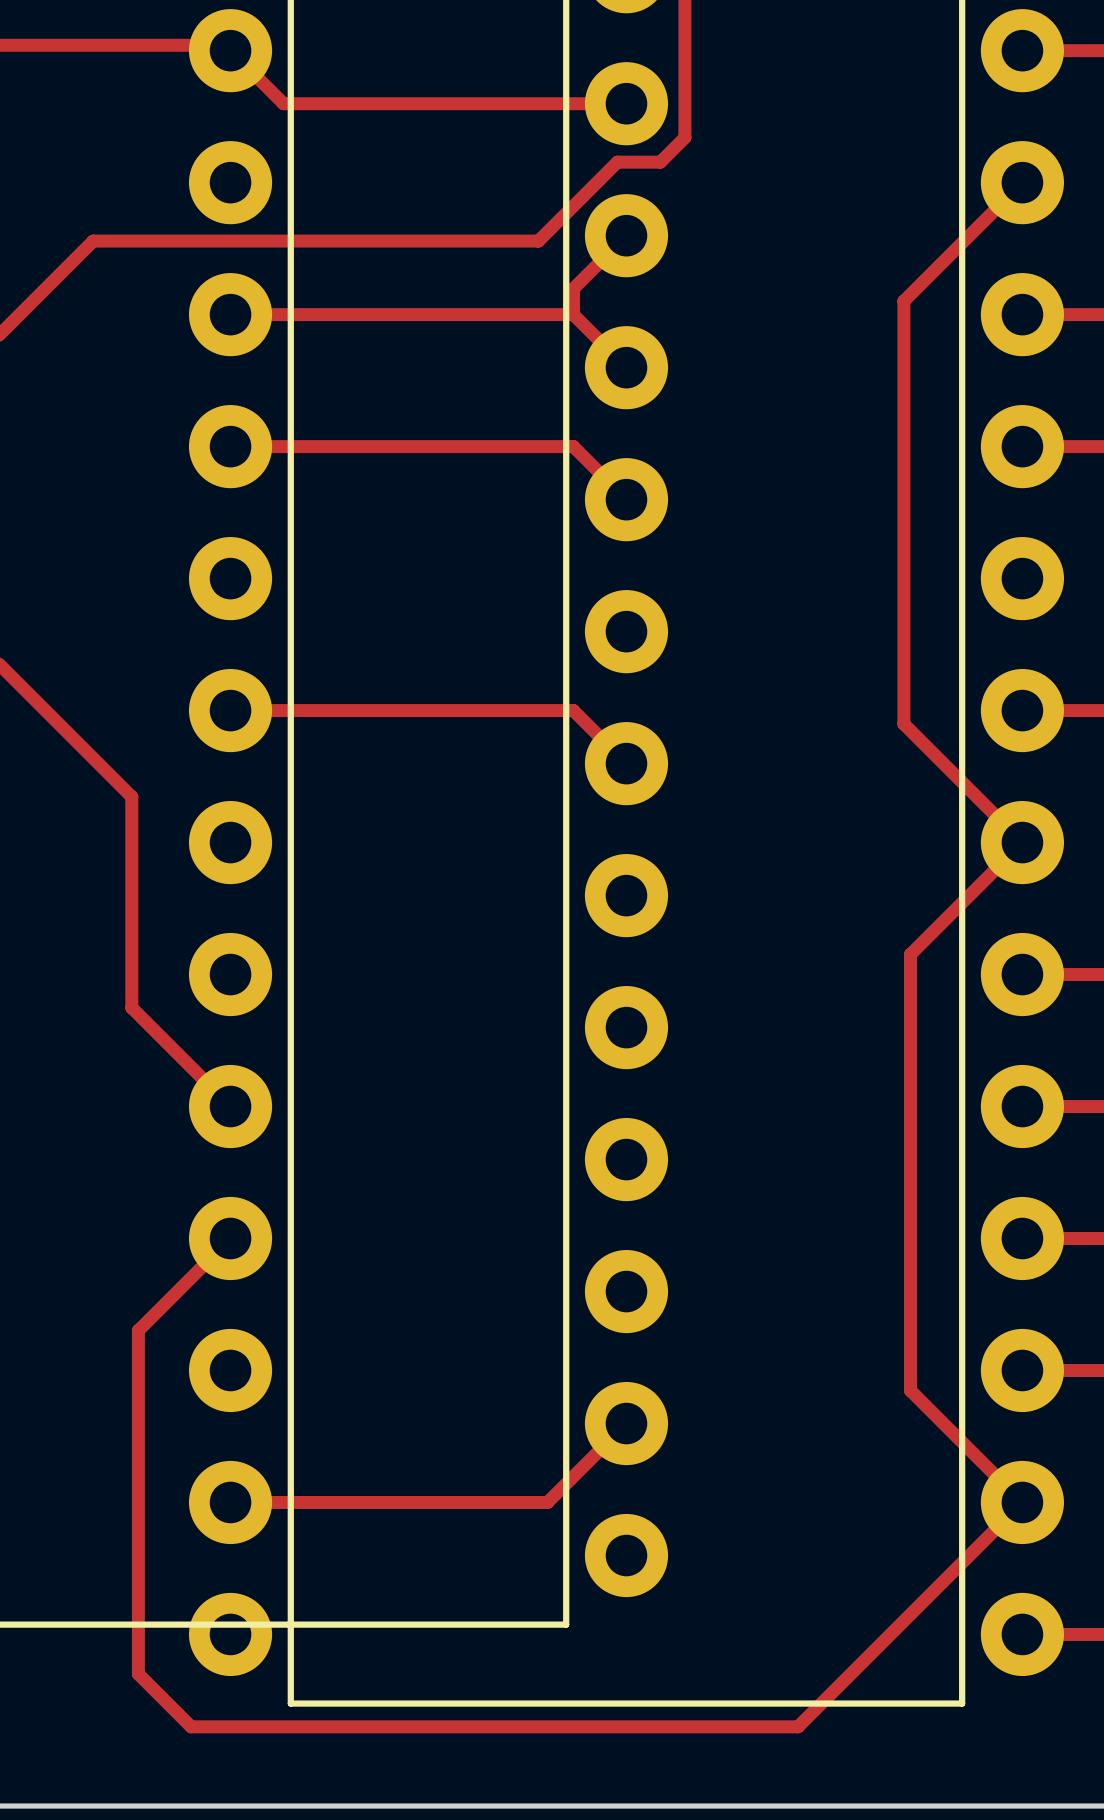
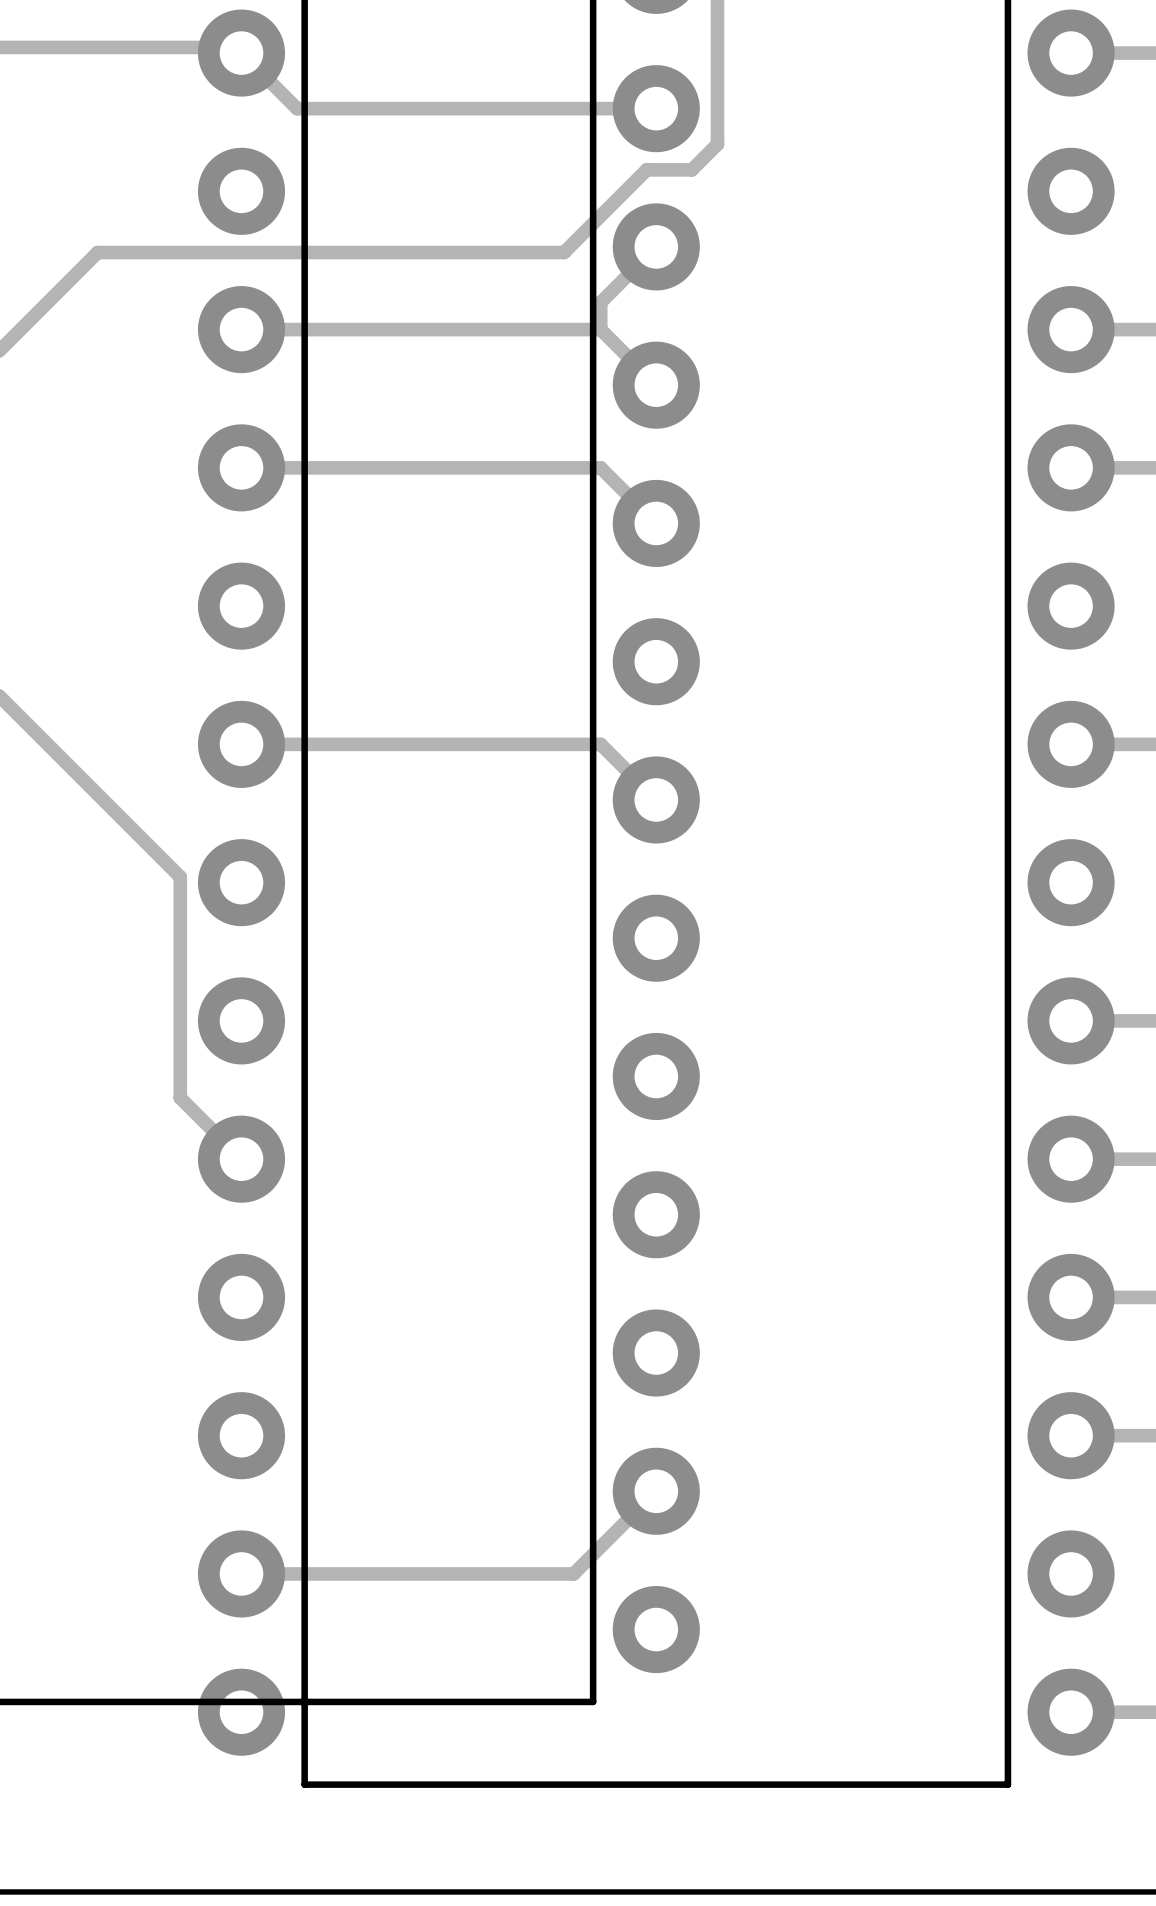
track: (1022, 182) (903, 301) (903, 724) (1022, 842) (910, 954) (910, 1390) (1022, 1502) (798, 1726) (191, 1726) (138, 1674) (138, 1330) (230, 1238) -> none
track: (131, 796) (131, 1007) (172, 1048) -> (138, 834) (180, 877) (180, 1097)

